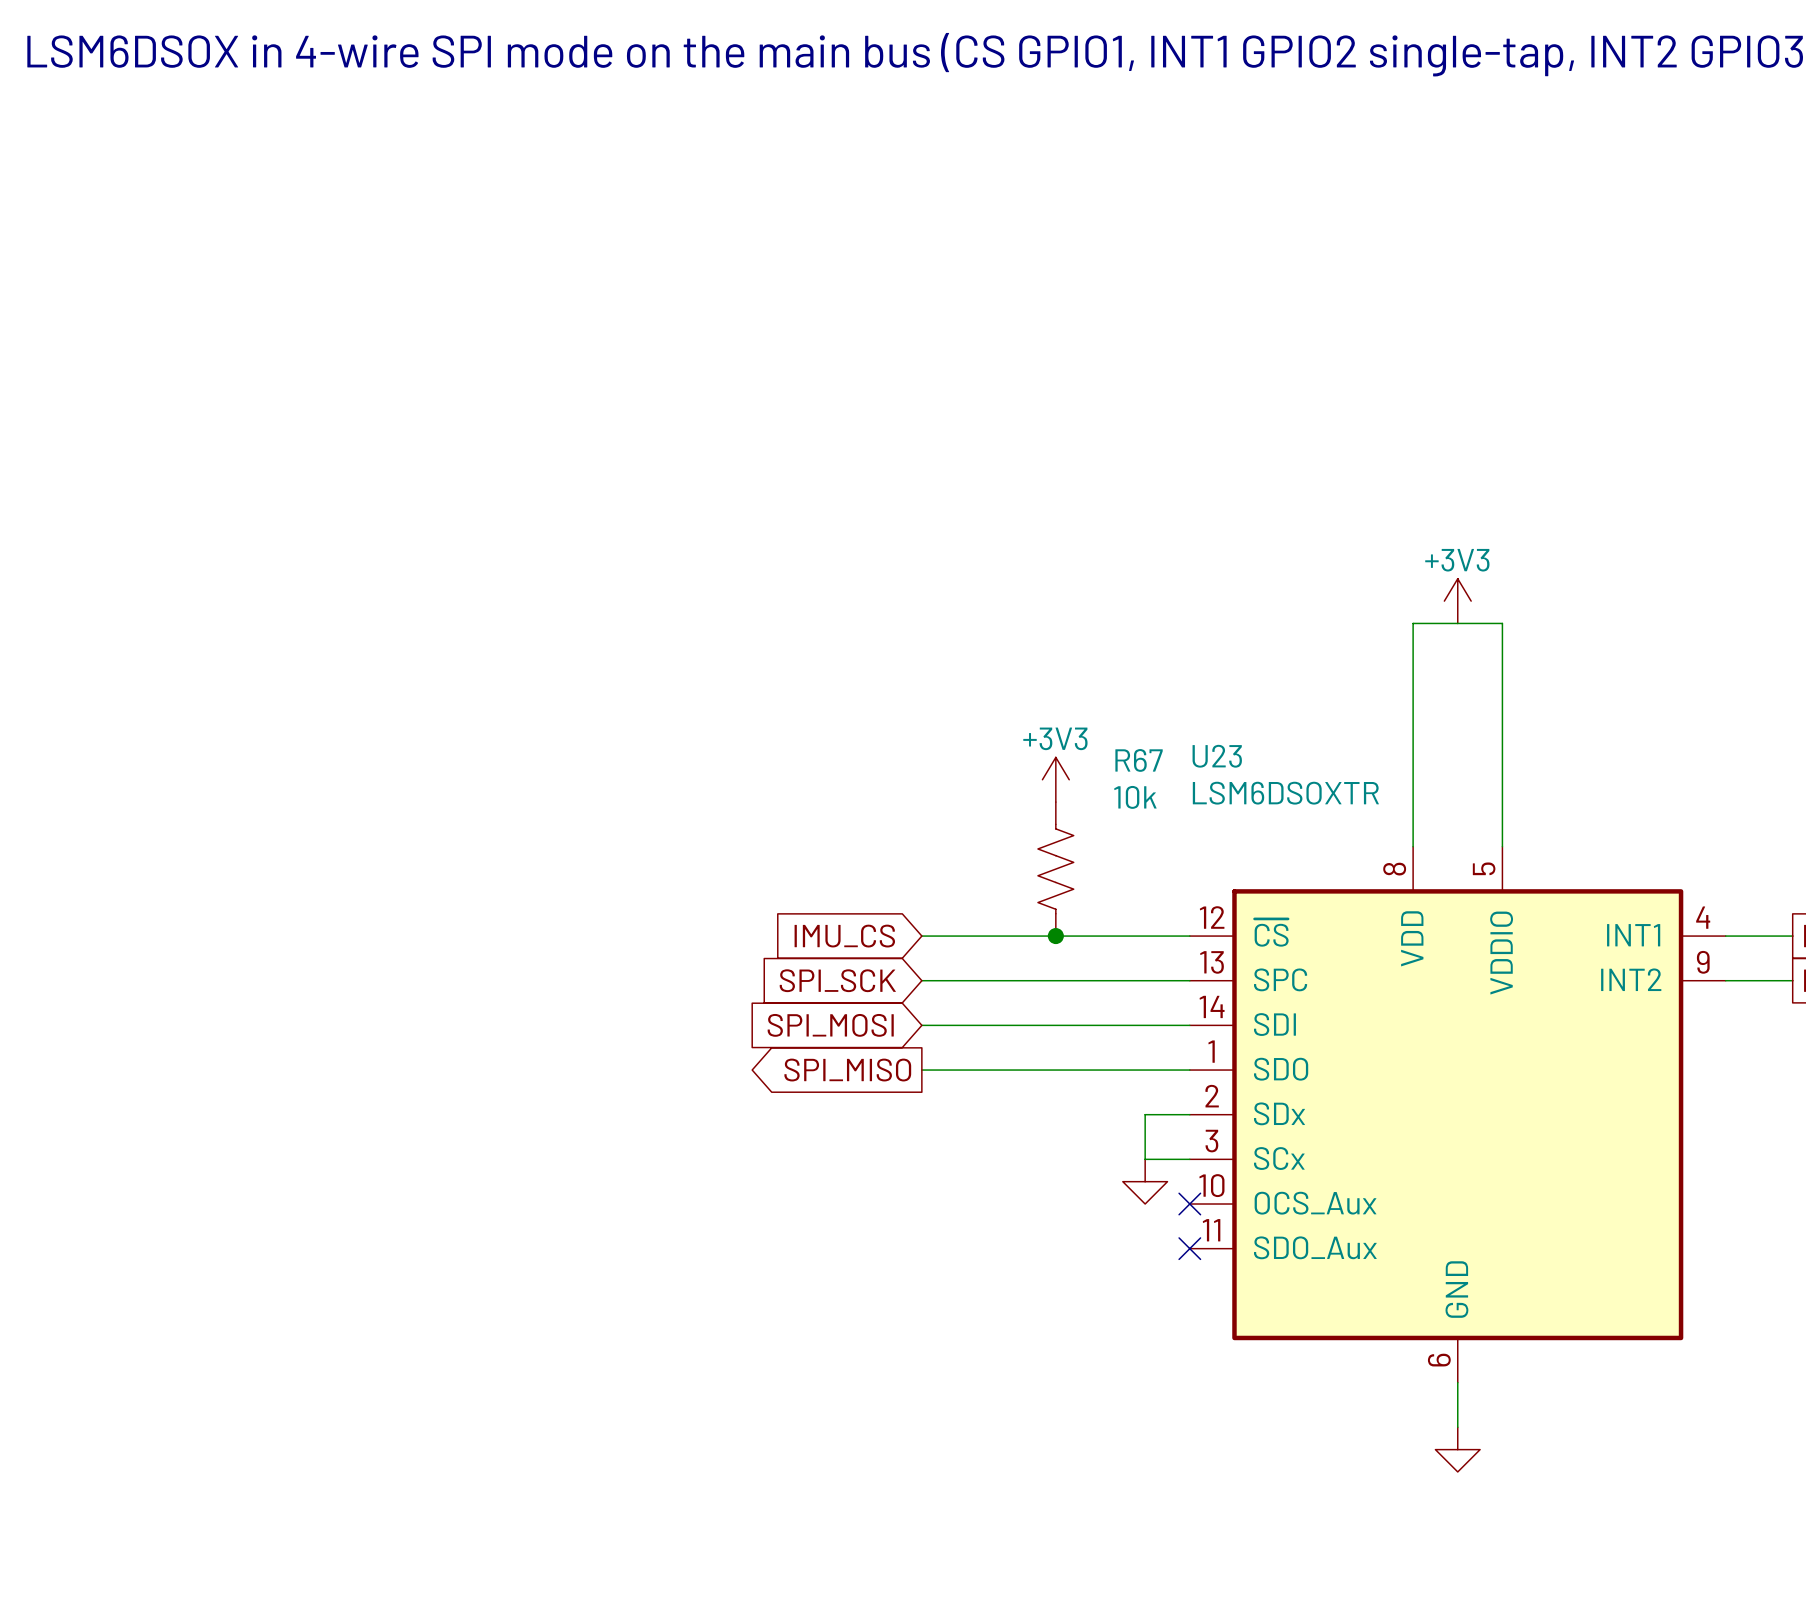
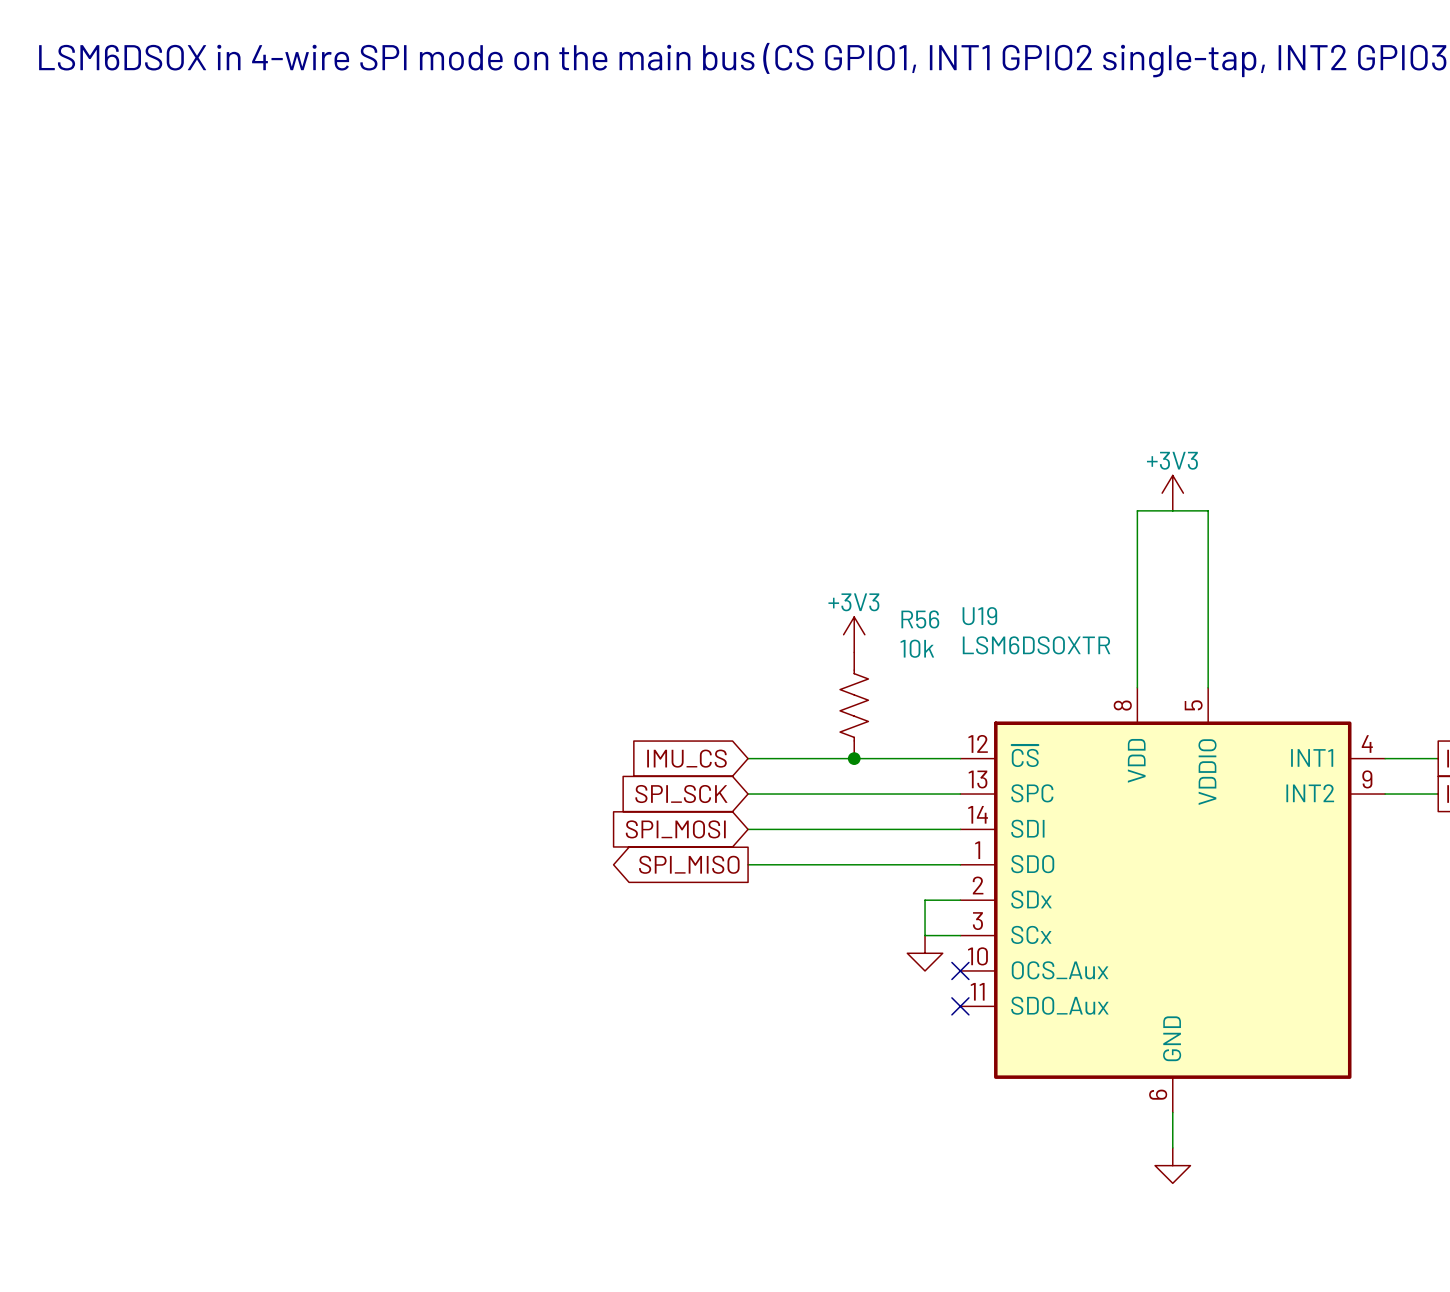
U23 name: U23 (1217, 756) -> U19 (979, 616)
R67 name: R67 (1139, 760) -> R56 (920, 619)

